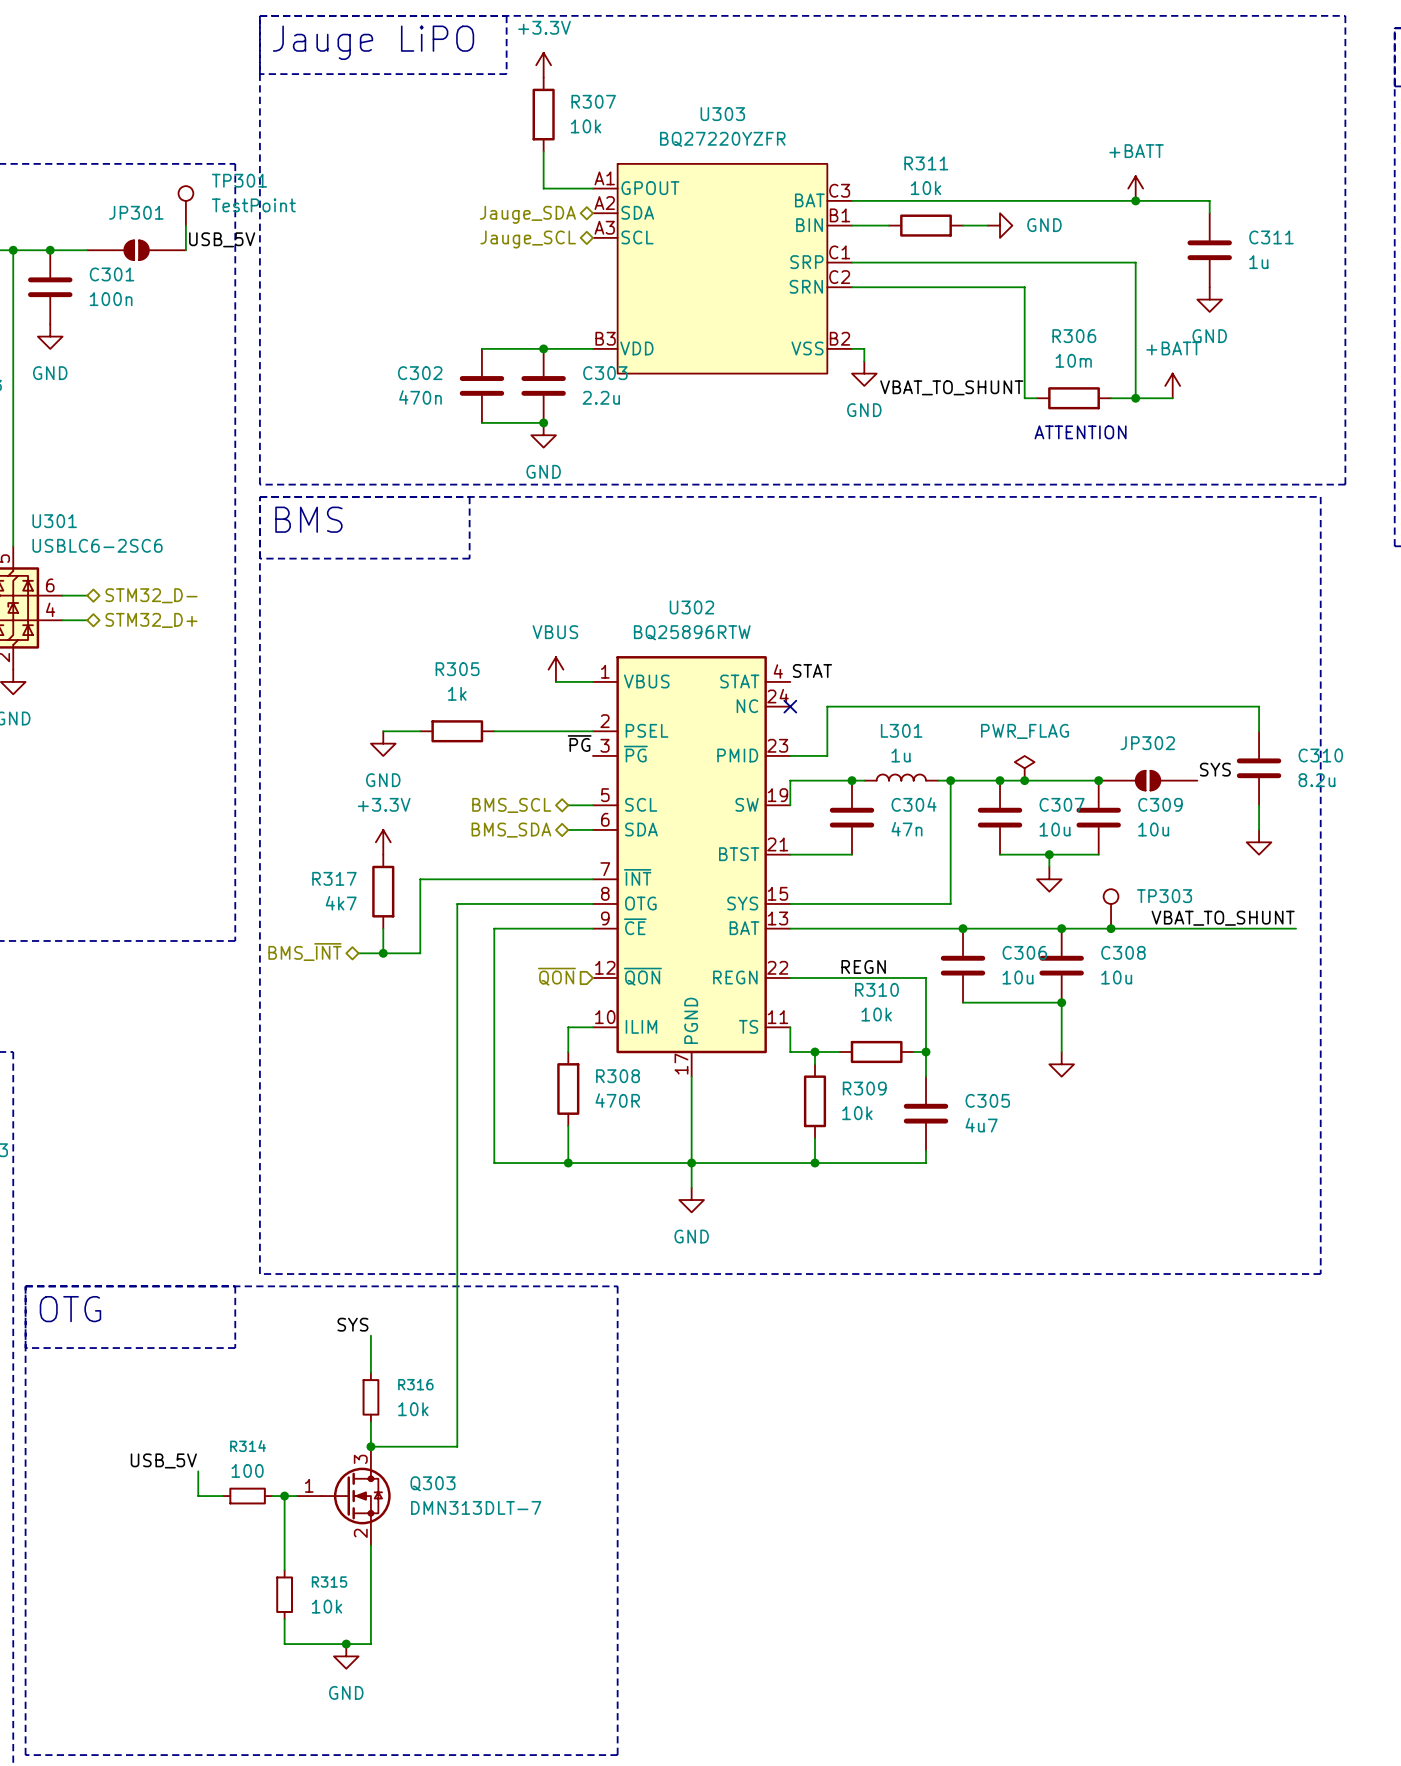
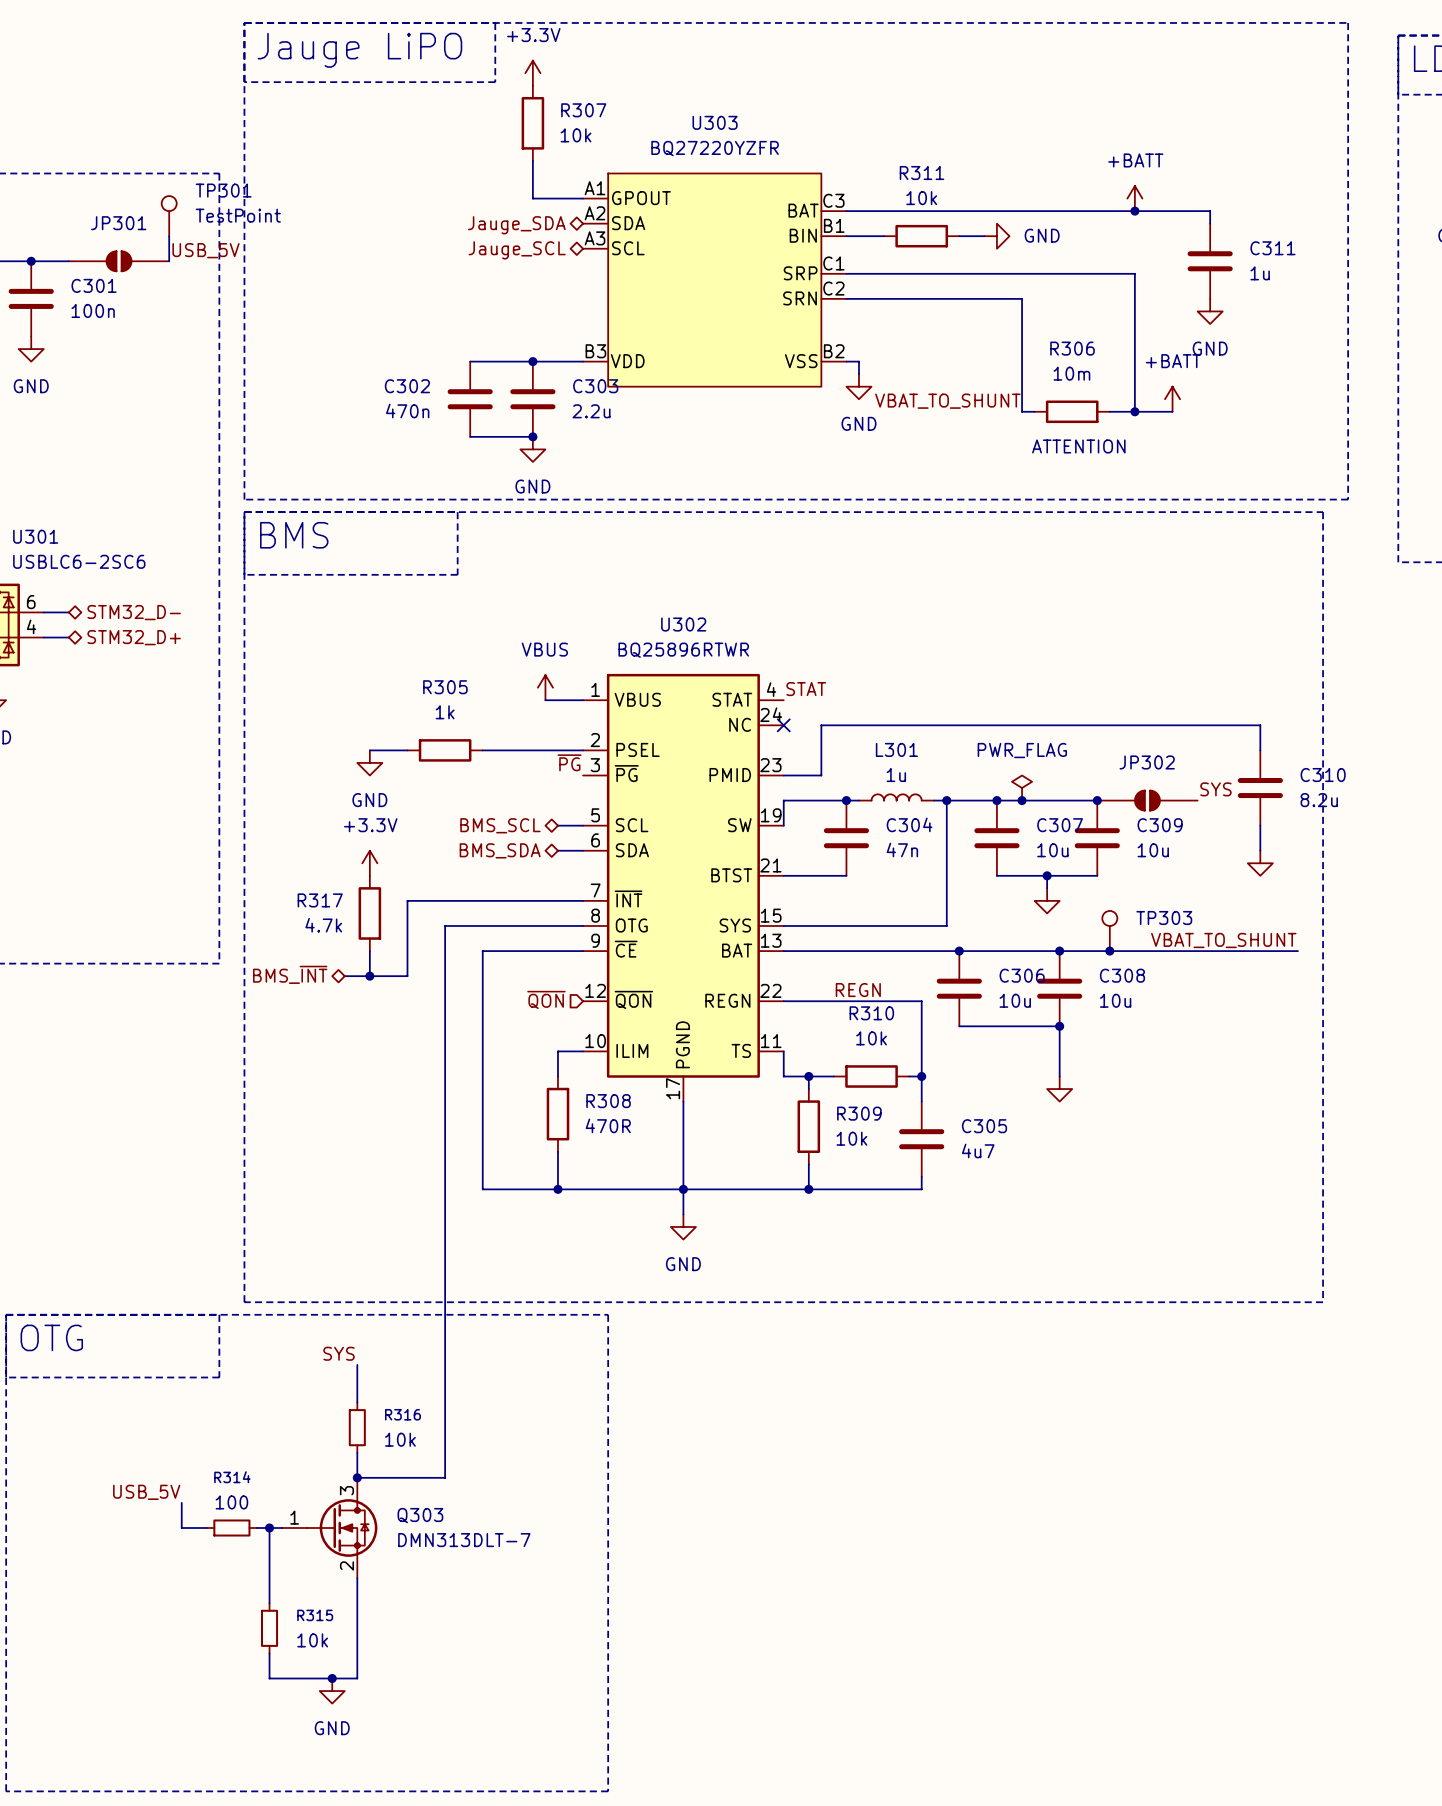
U302 value: BQ25896RTW (692, 632) -> BQ25896RTWR (683, 650)
R317 value: 4k7 (341, 903) -> 4.7k (323, 925)

